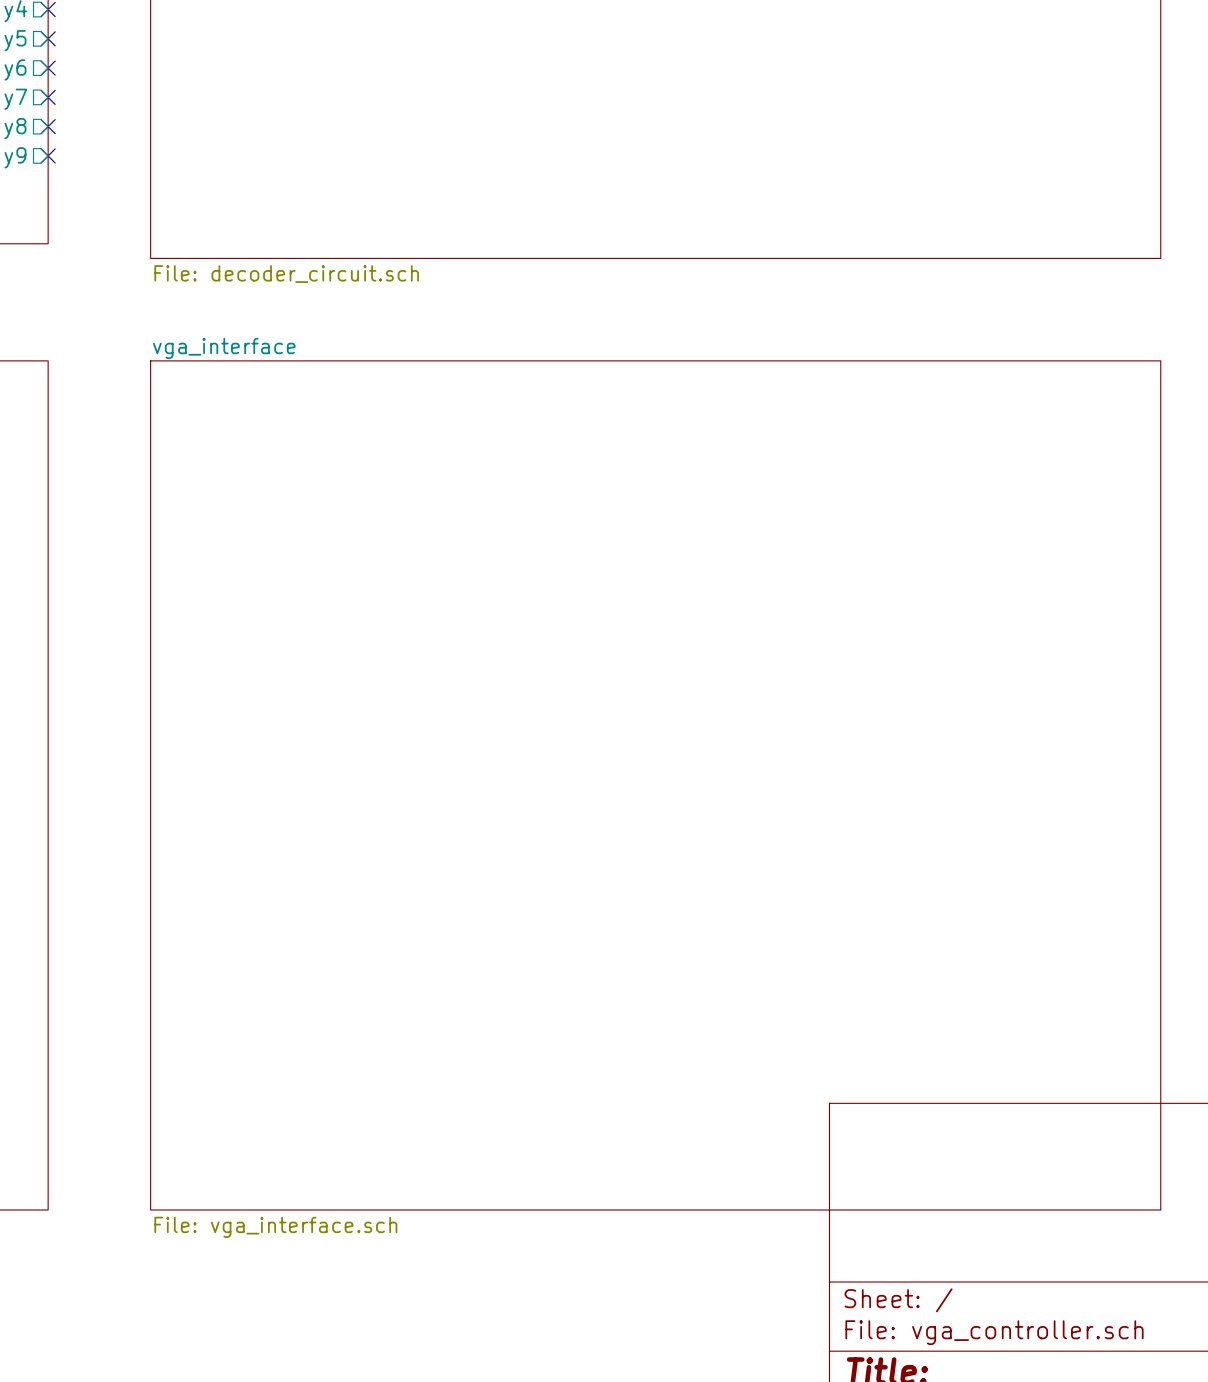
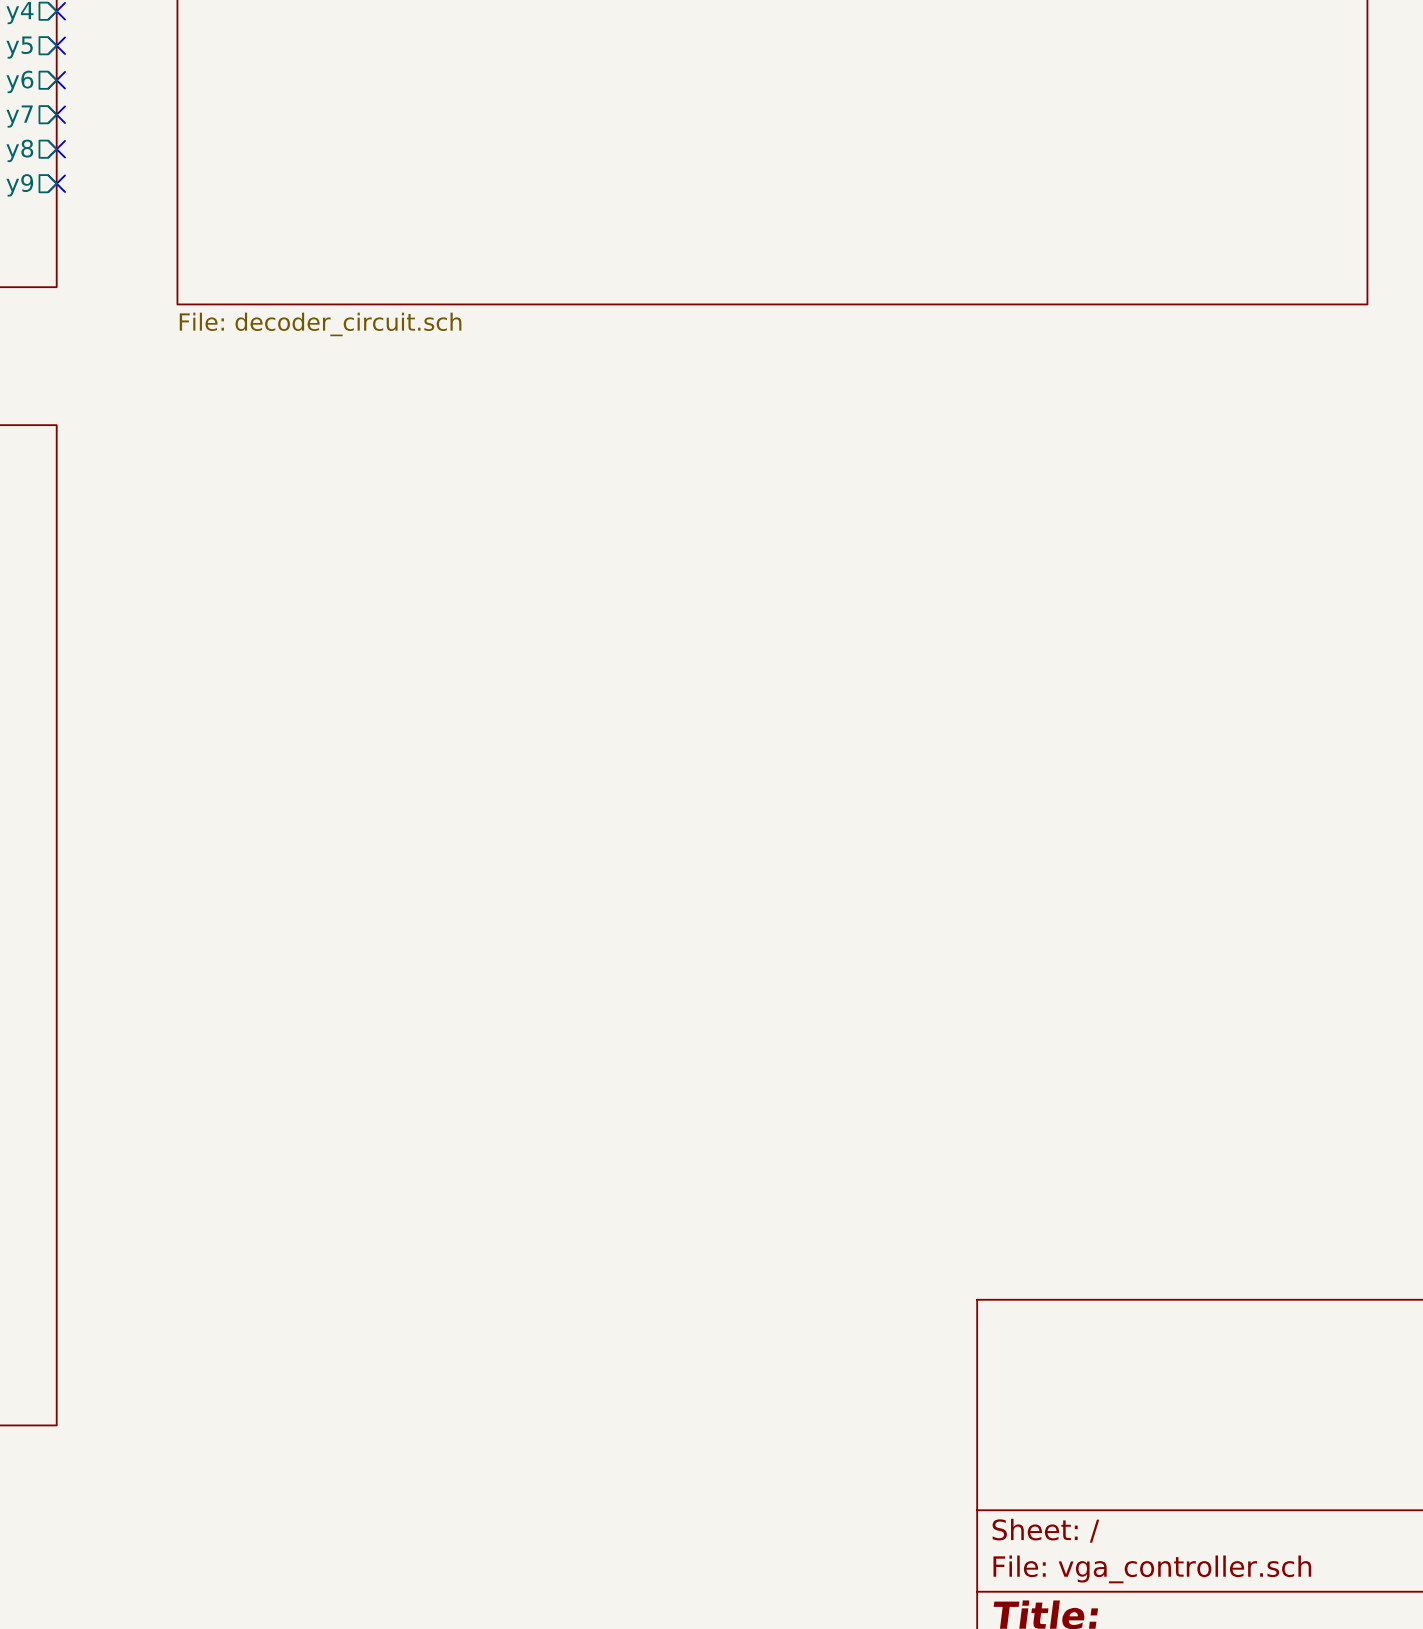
sheet vga_interface: File: vga_interface.sch (655, 785) -> none

